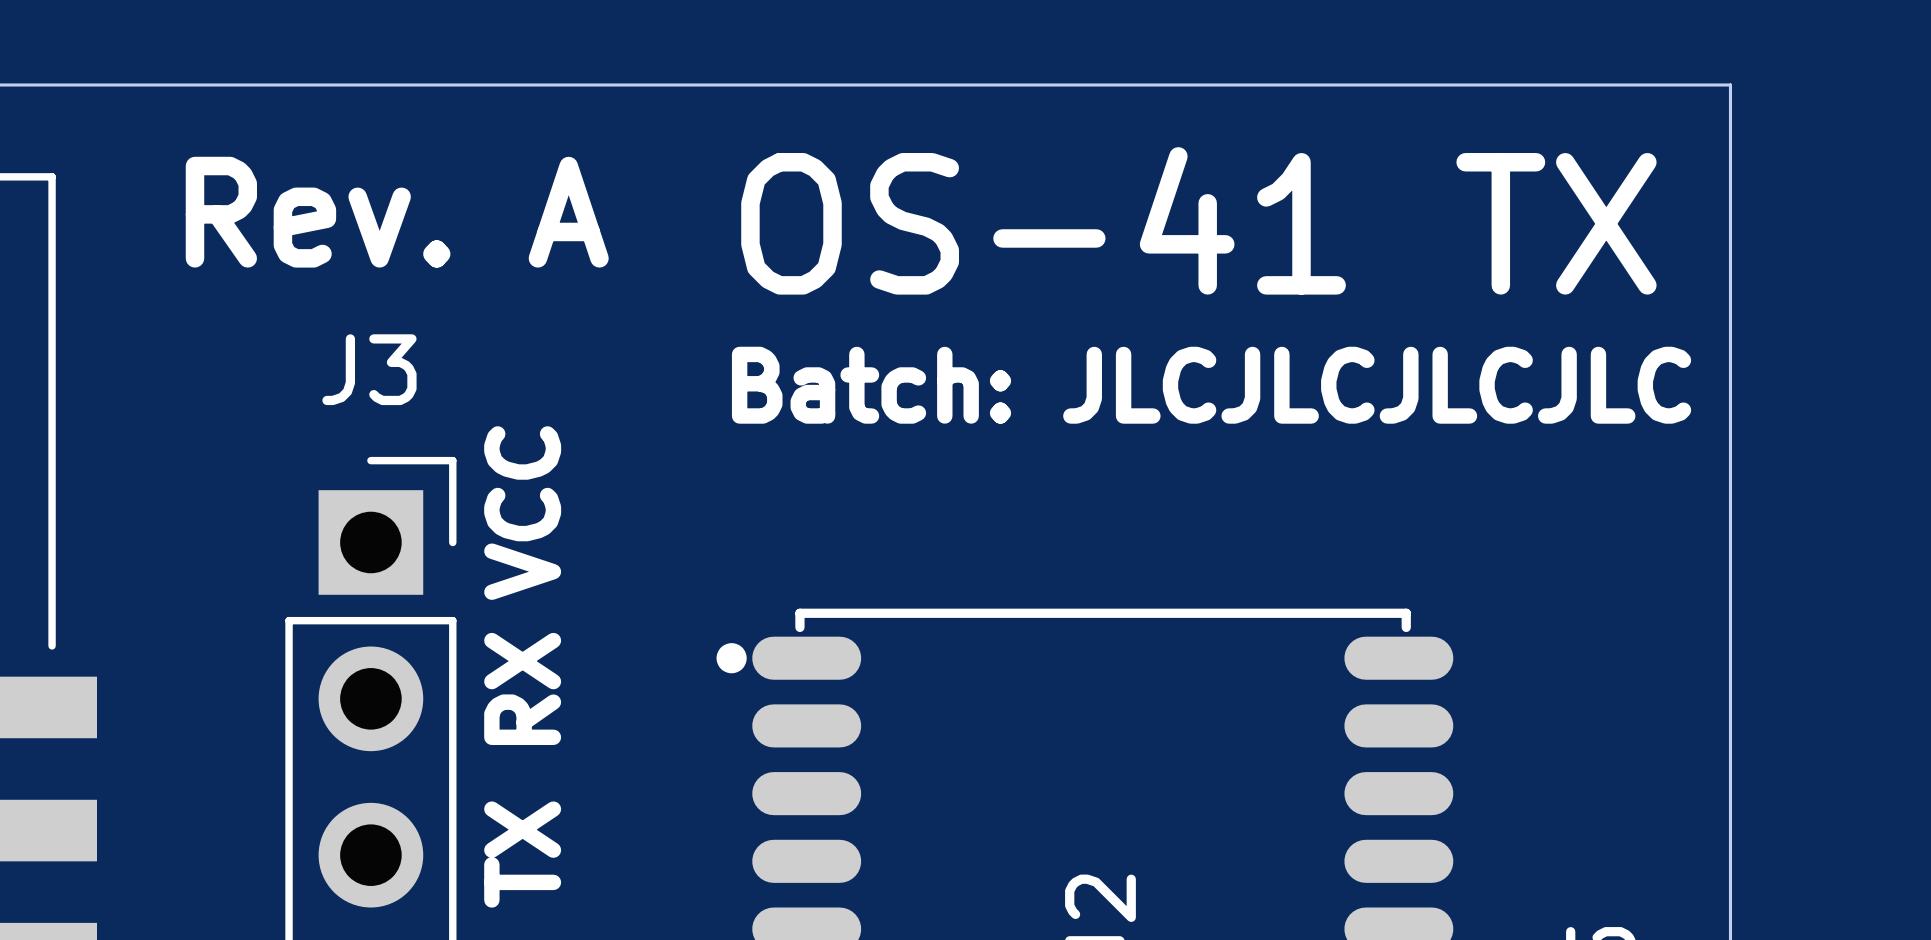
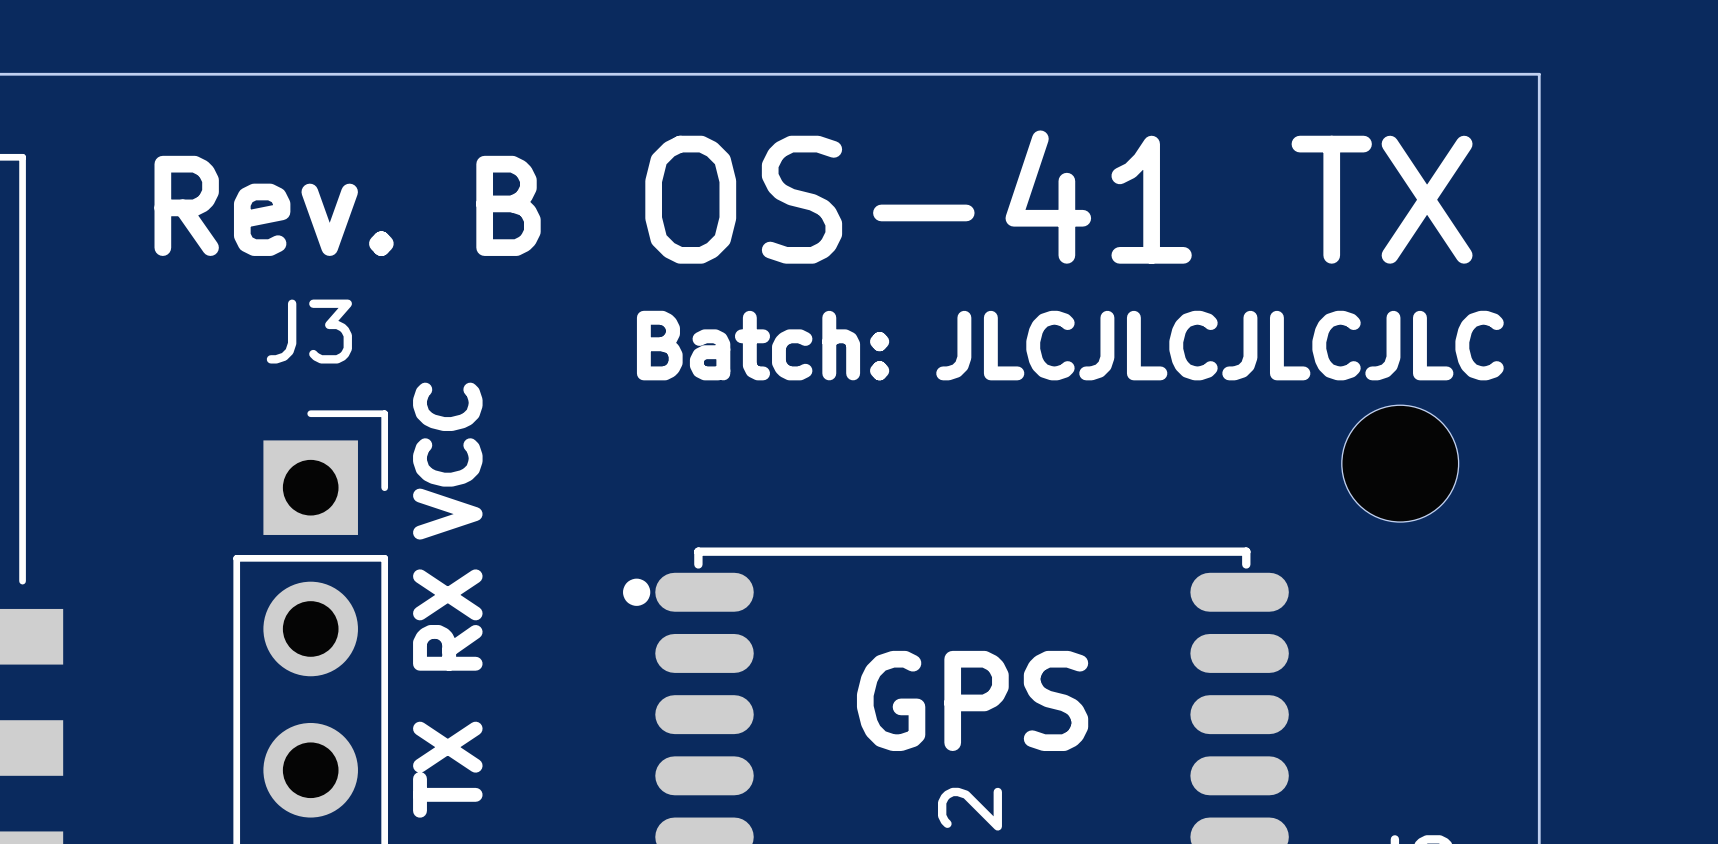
text: Rev. A (397, 212) -> Rev. B (347, 205)
part: none -> (1400, 463)
text: none -> GPS (972, 700)

